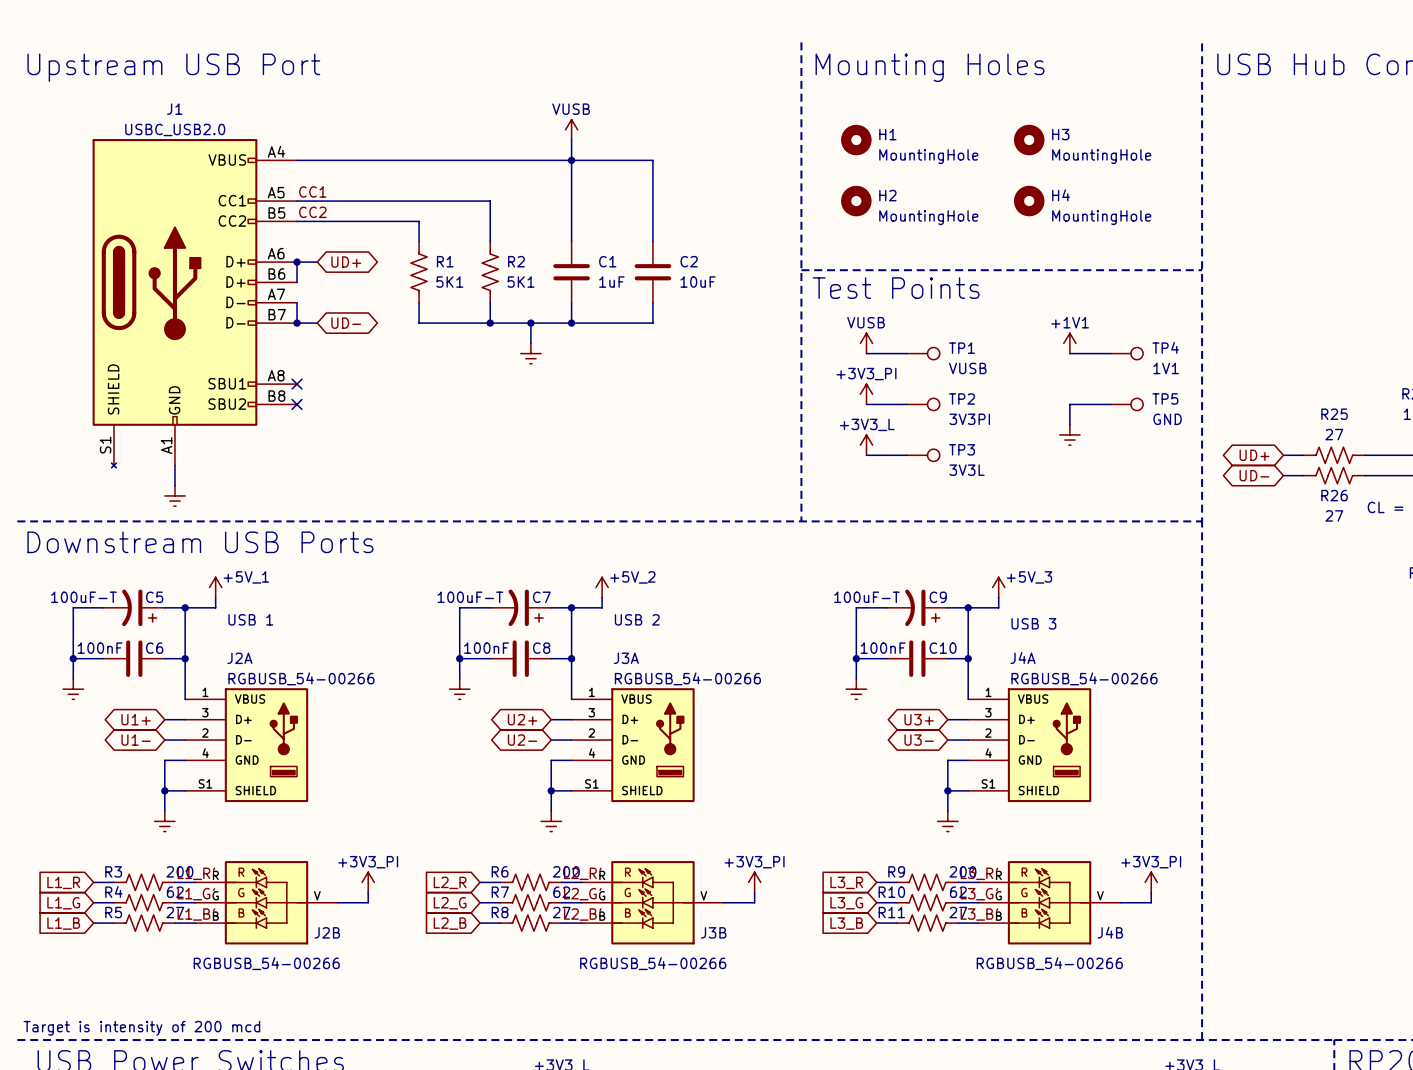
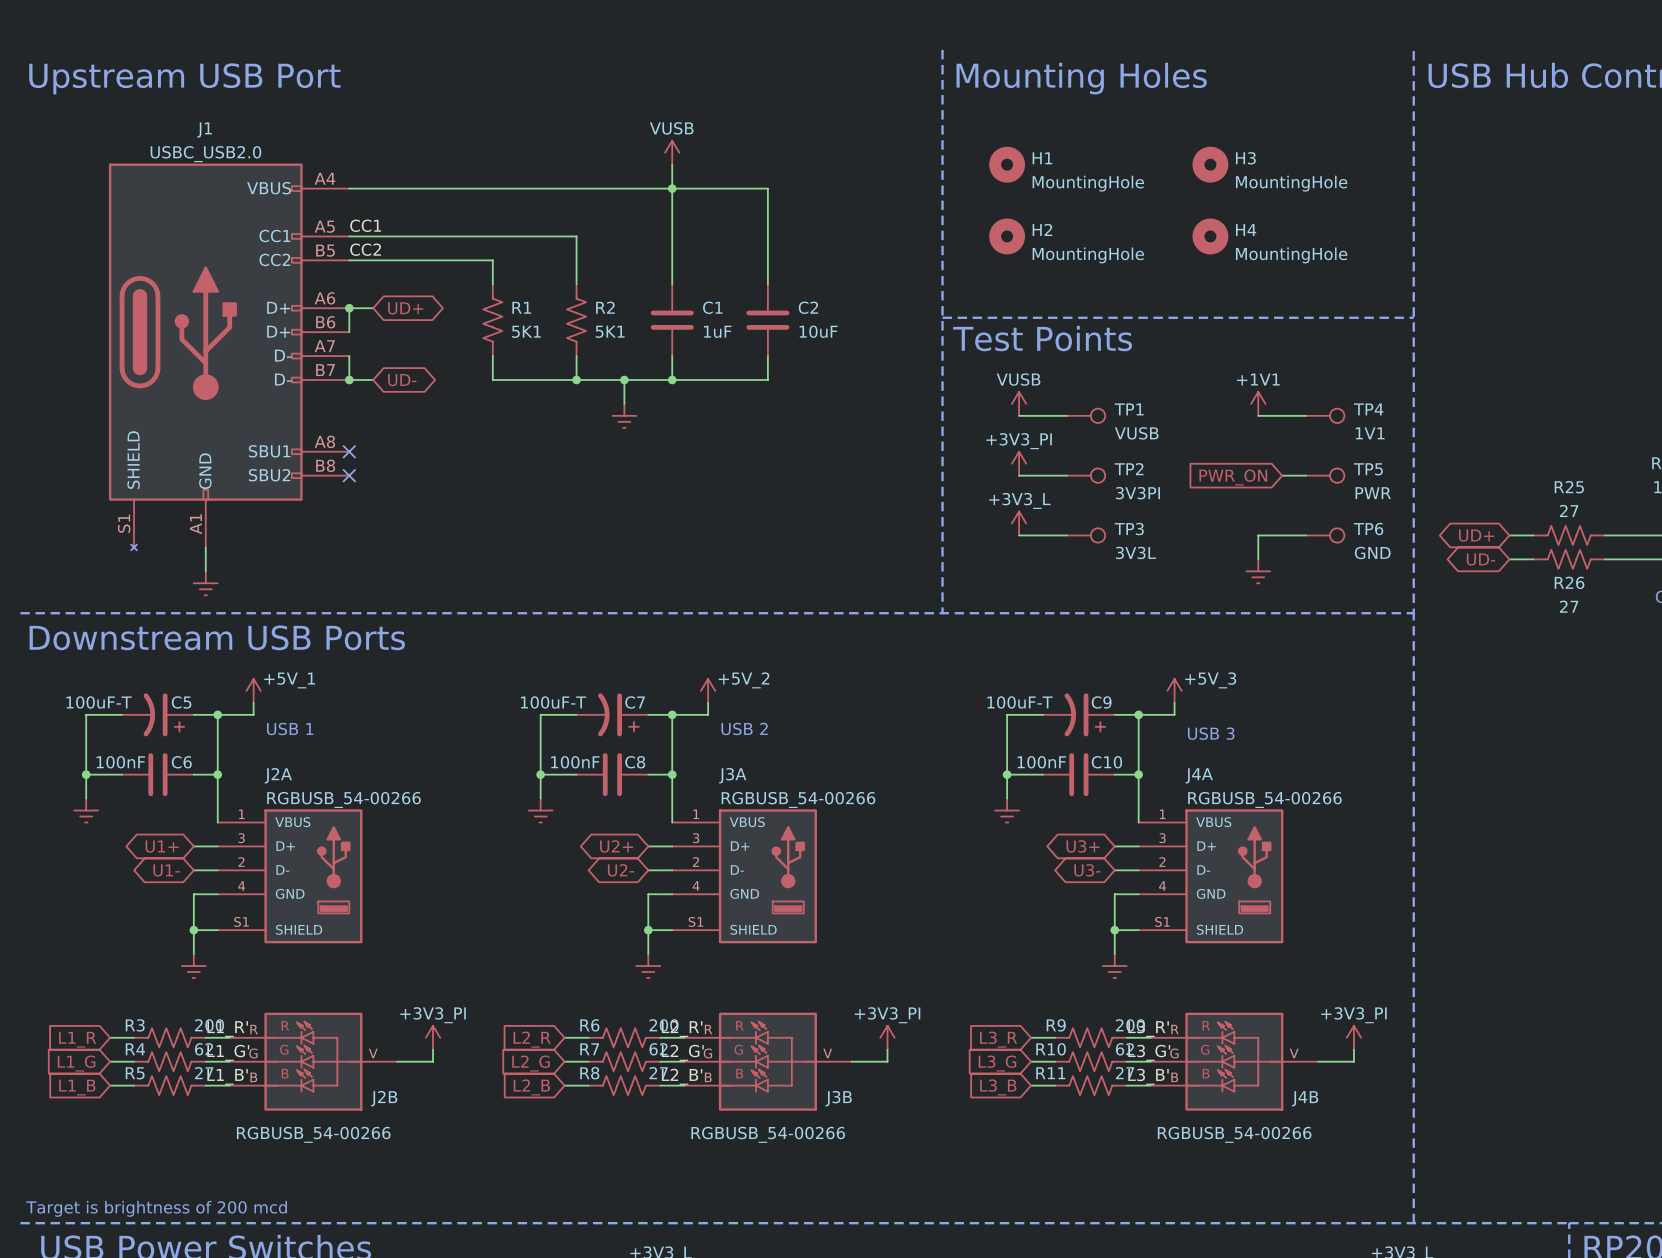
global label: none -> PWR_ON (1233, 477)
wire: (1090, 404) (1069, 404) (1069, 424) -> none
TP5 value: GND (1167, 419) -> PWR (1373, 493)
power symbol position: (1069, 434) -> (1258, 571)
wire: none -> (1306, 535) (1258, 535) (1258, 559)
TP6: none -> GND (1325, 535)
text: Target is intensity of 200 mcd (141, 1028) -> Target is brightness of 200 mcd (156, 1208)

